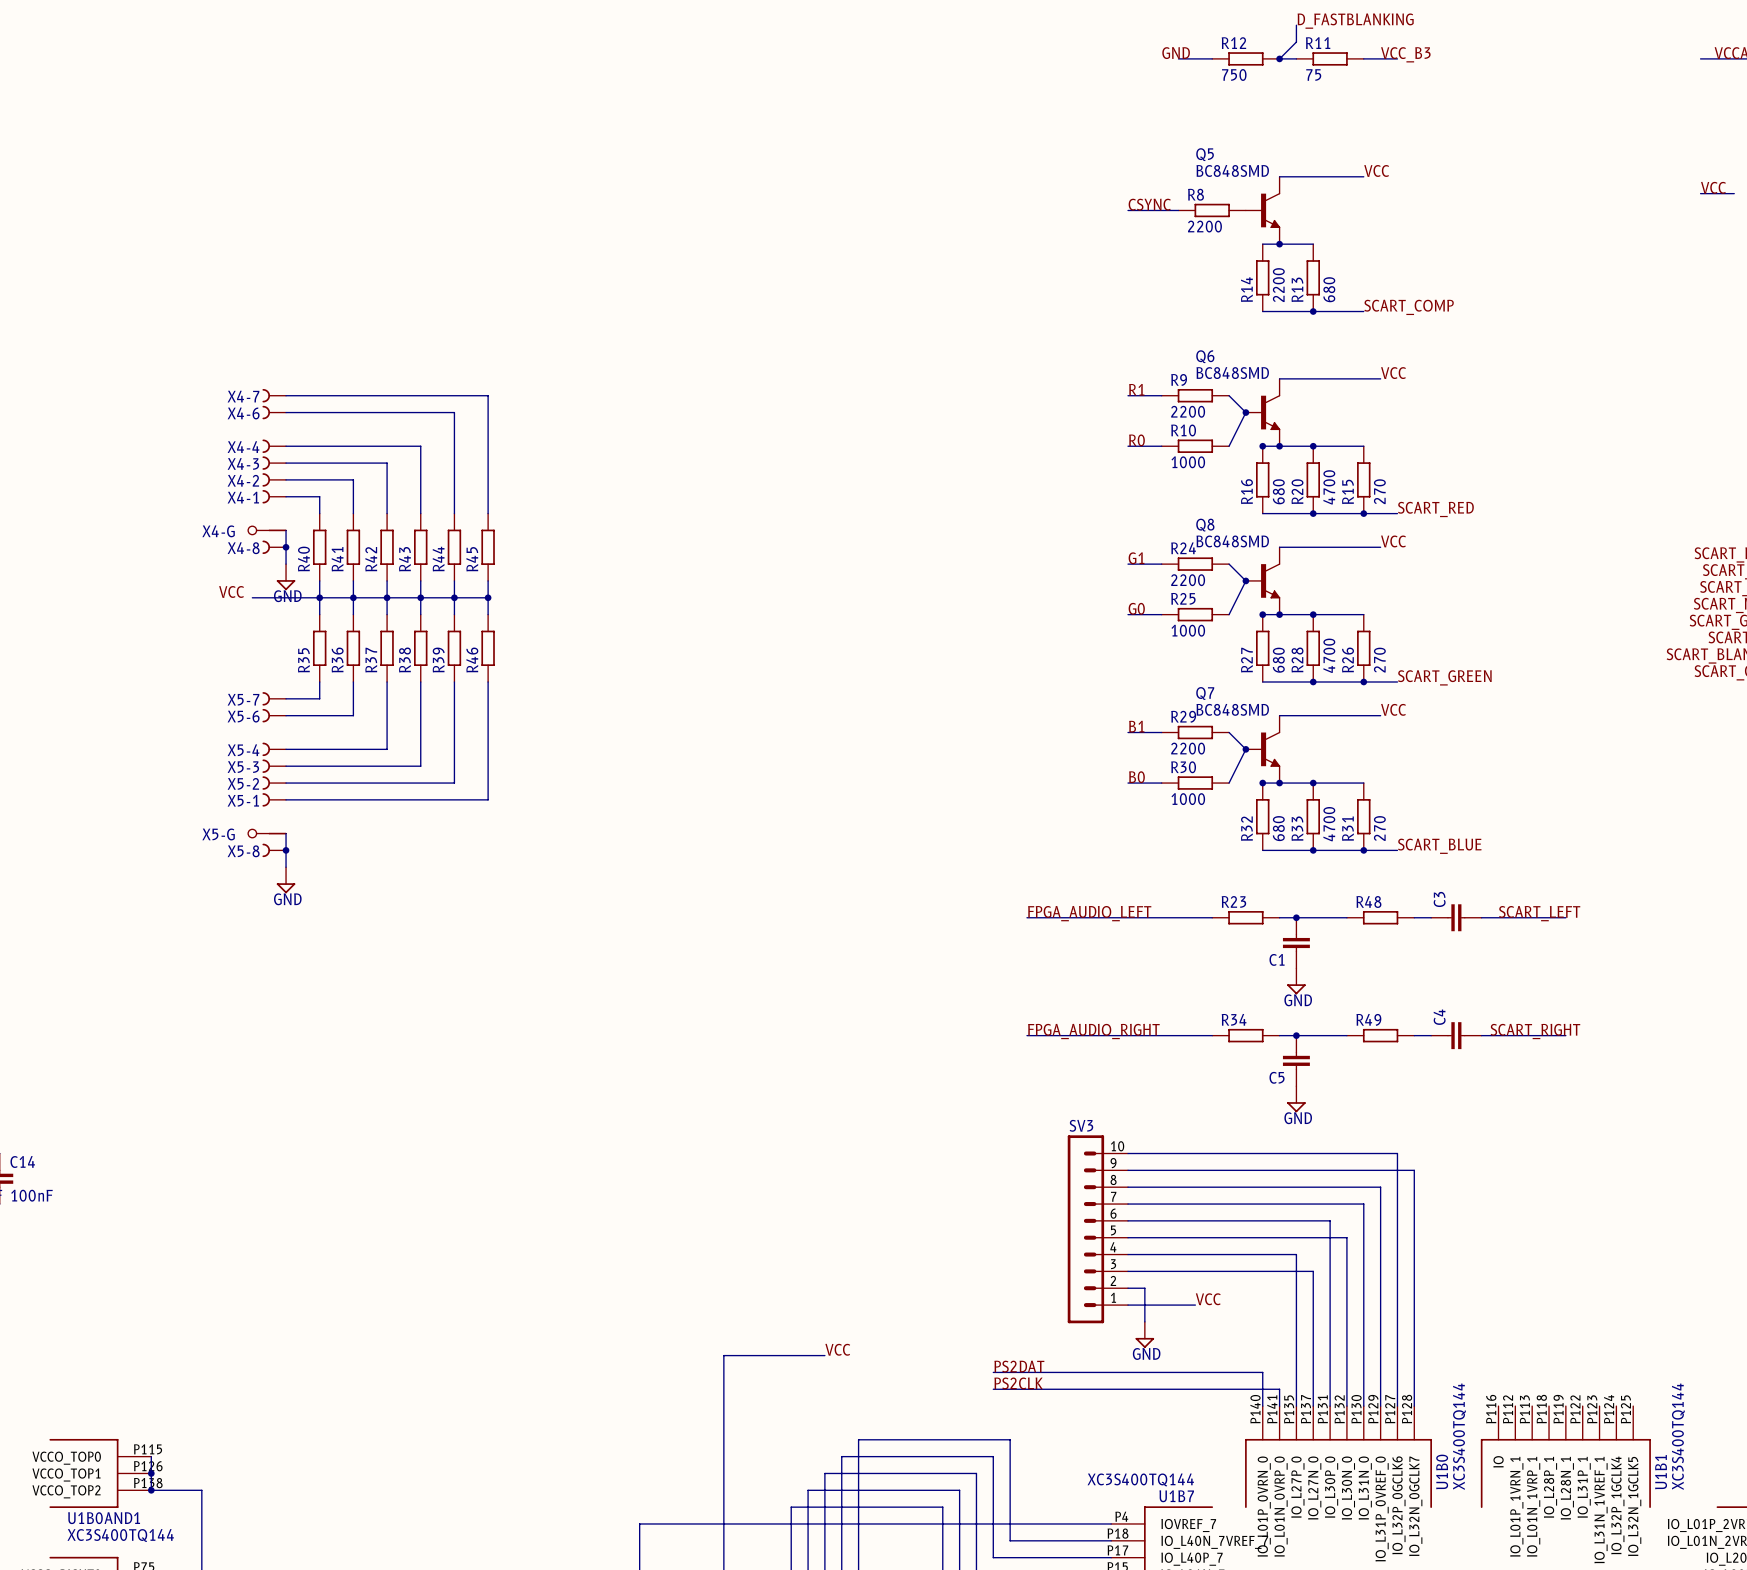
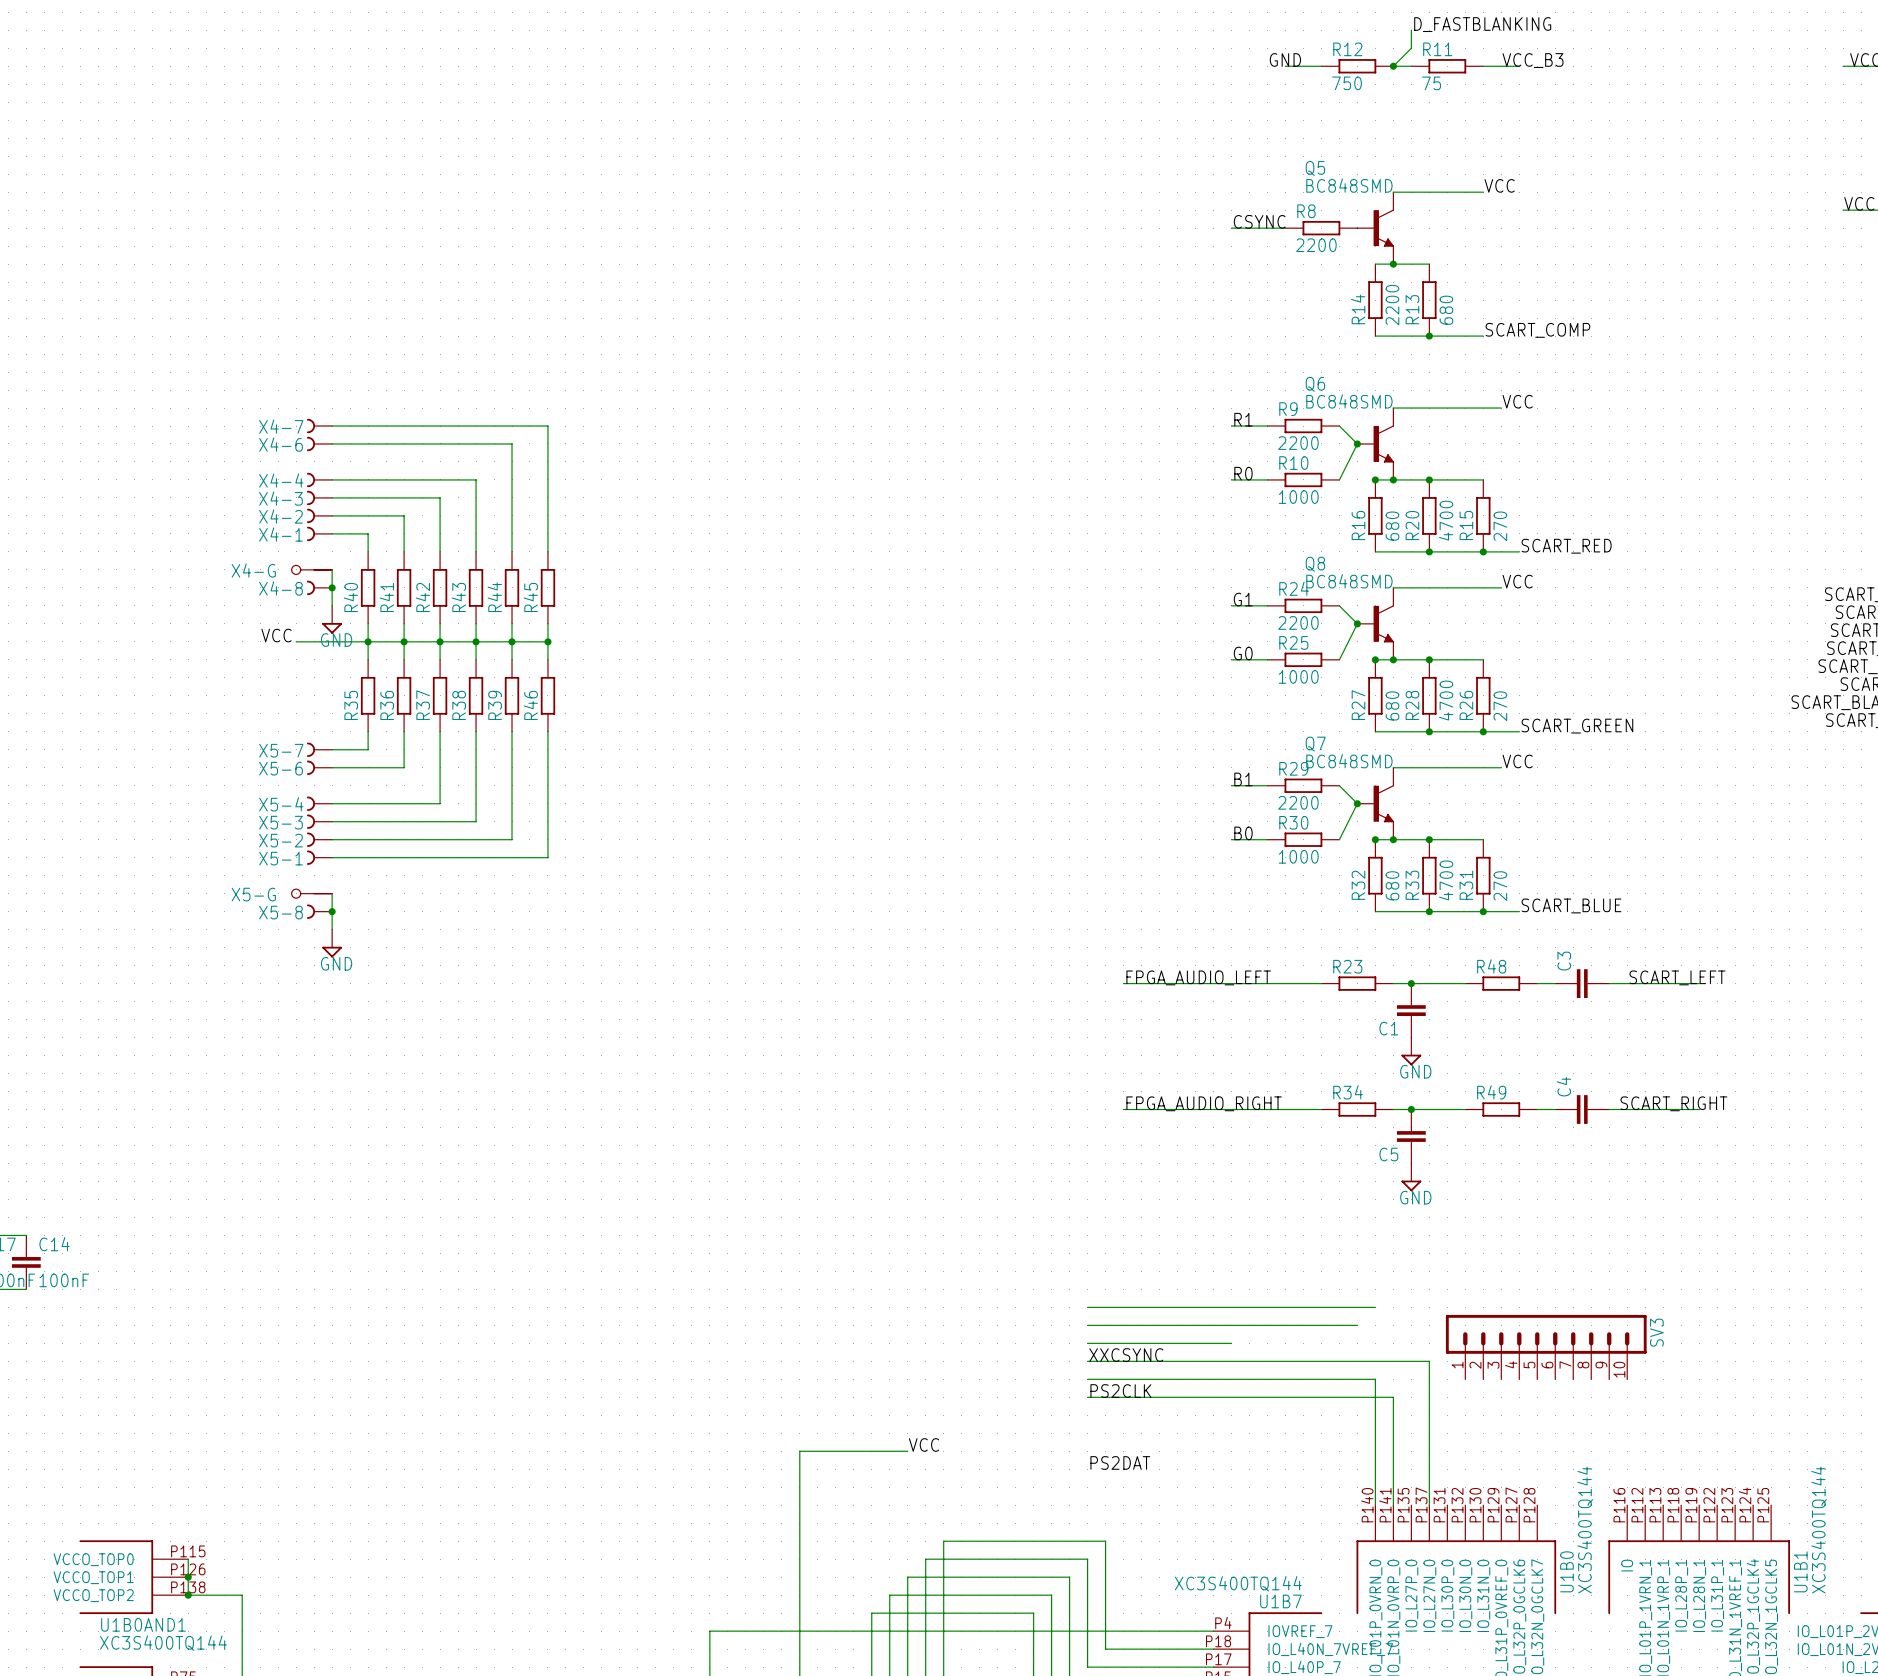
wire: (1128, 1153) (1397, 1153) (1397, 1406) -> none
wire: (1128, 1170) (1414, 1170) (1414, 1406) -> none
wire: (1128, 1187) (1380, 1187) (1380, 1406) -> none
wire: (1128, 1204) (1363, 1204) (1363, 1406) -> none
wire: none -> (1087, 1307) (1231, 1307)
wire: (1262, 1220) (1330, 1220) (1330, 1406) -> none
SV3 rotation: 0° (1085, 1229) -> 90° clockwise (1546, 1334)
SV3 position: (1097, 1229) -> (1546, 1347)
wire: none -> (1087, 1325) (1231, 1325)
wire: (1245, 1237) (1346, 1237) (1346, 1406) -> none
wire: (1128, 1254) (1296, 1254) (1296, 1406) -> (1231, 1343) (1087, 1343)
label: none -> XXCSYNC (1126, 1355)
wire: none -> (1087, 1361) (1231, 1361)
wire: none -> (1087, 1379) (1231, 1379)
wire: (1144, 1288) (1144, 1321) -> (1249, 1379) (1375, 1379) (1375, 1469)
label: VCC (1208, 1299) -> none
wire: none -> (1087, 1397) (1231, 1397)
power symbol: GND (1144, 1334) -> none
wire: (993, 1372) (1262, 1372) -> none
label position: PS2CLK (1018, 1383) -> PS2CLK (1120, 1391)
wire: (993, 1389) (1279, 1389) -> (1303, 1397) (1393, 1397) (1393, 1487)

